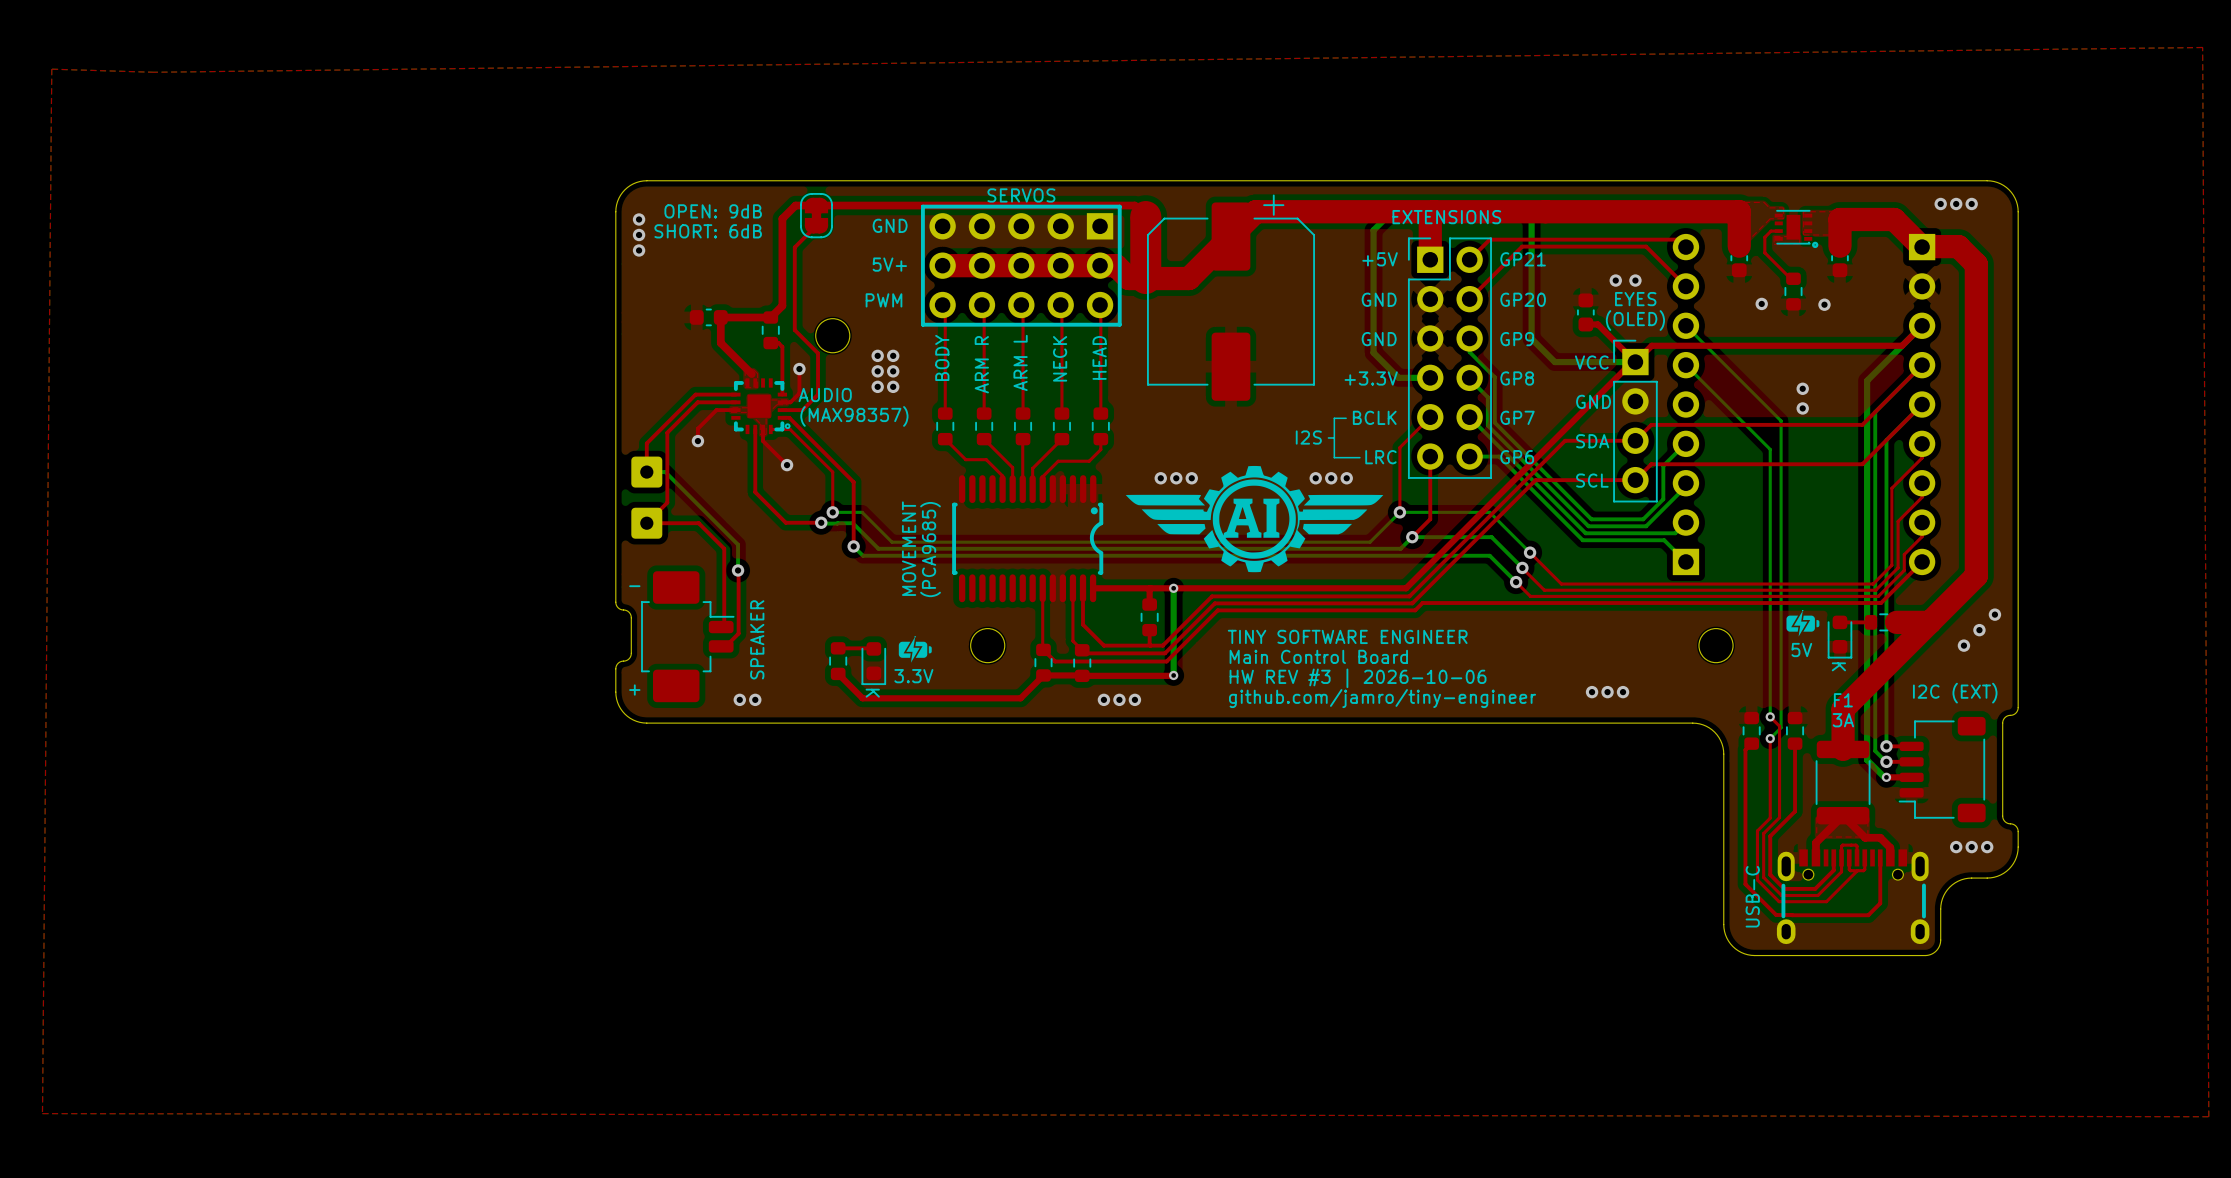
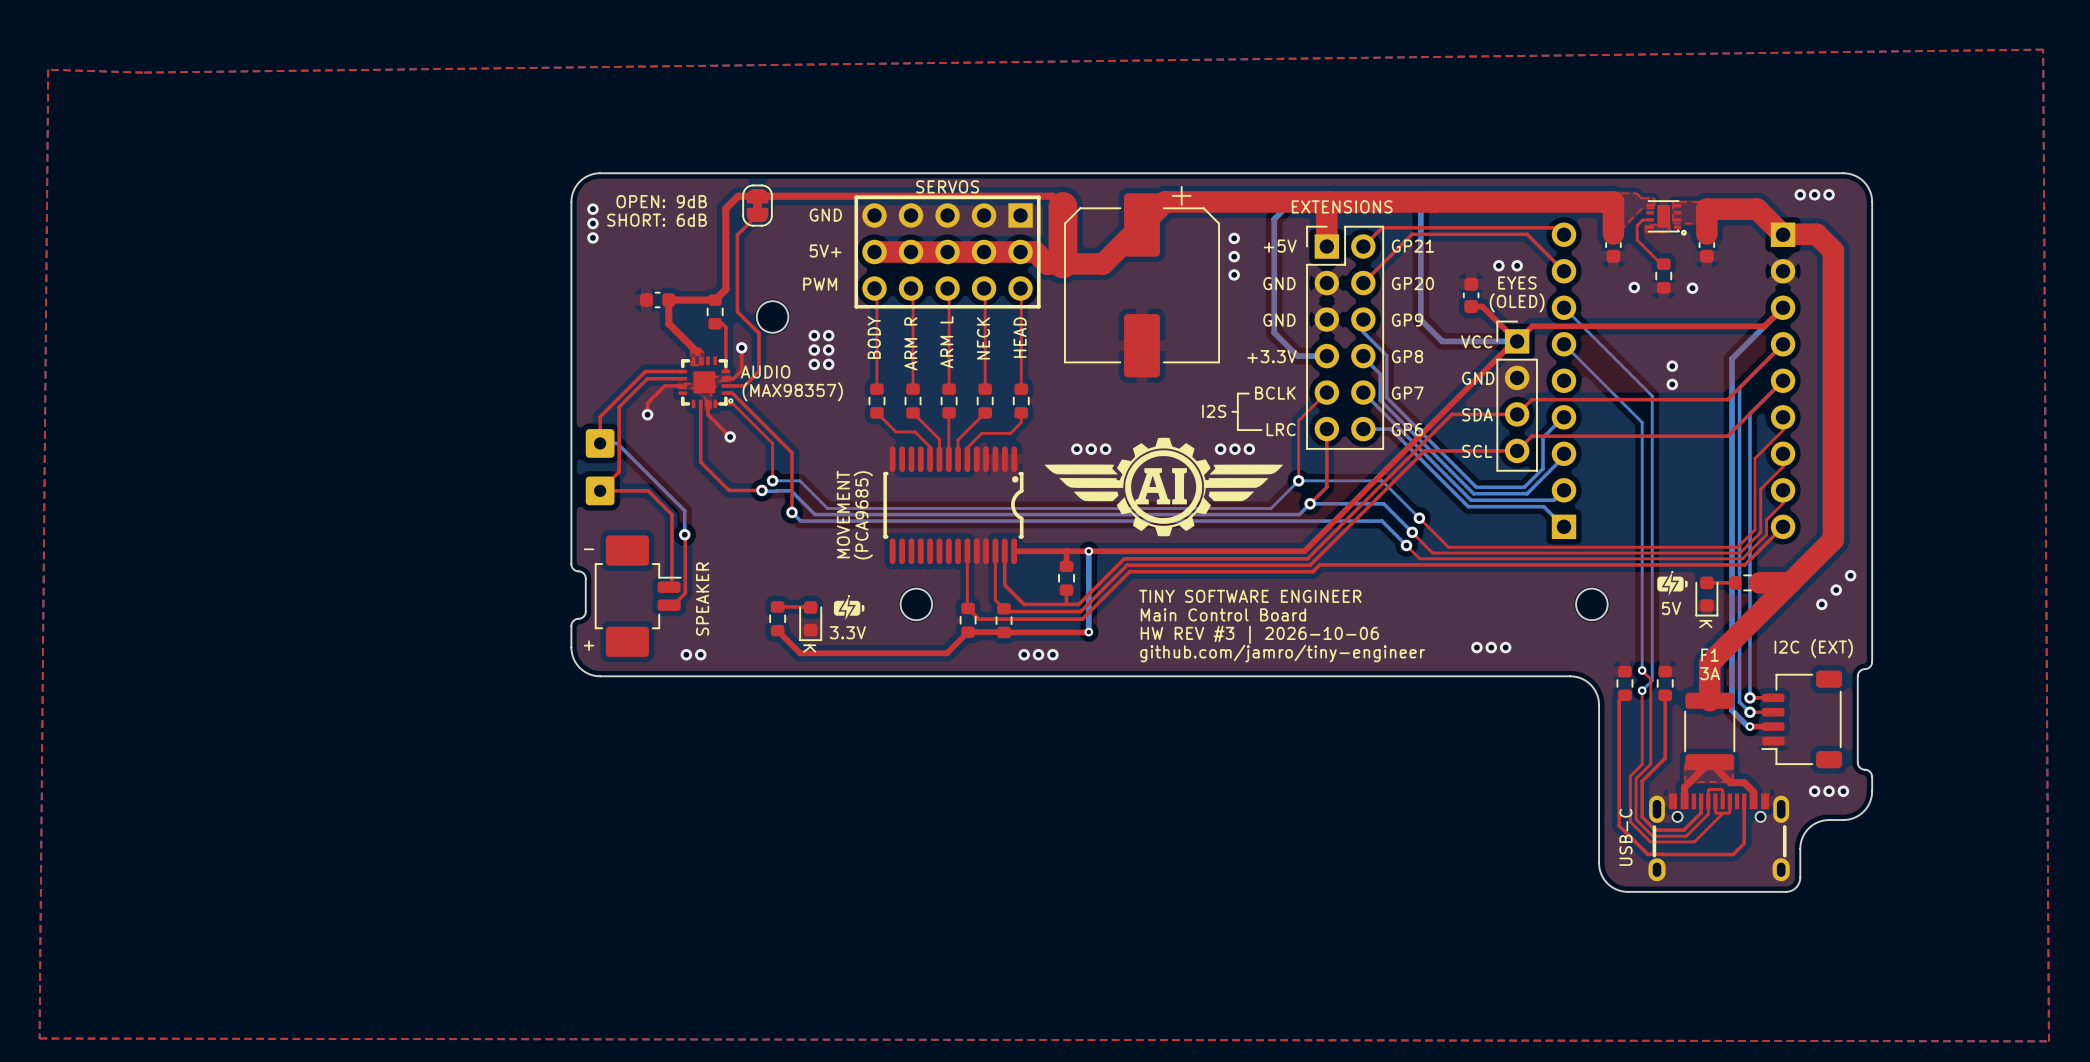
via: none -> (1234, 238)
via: none -> (1234, 256)
via: none -> (1234, 274)

